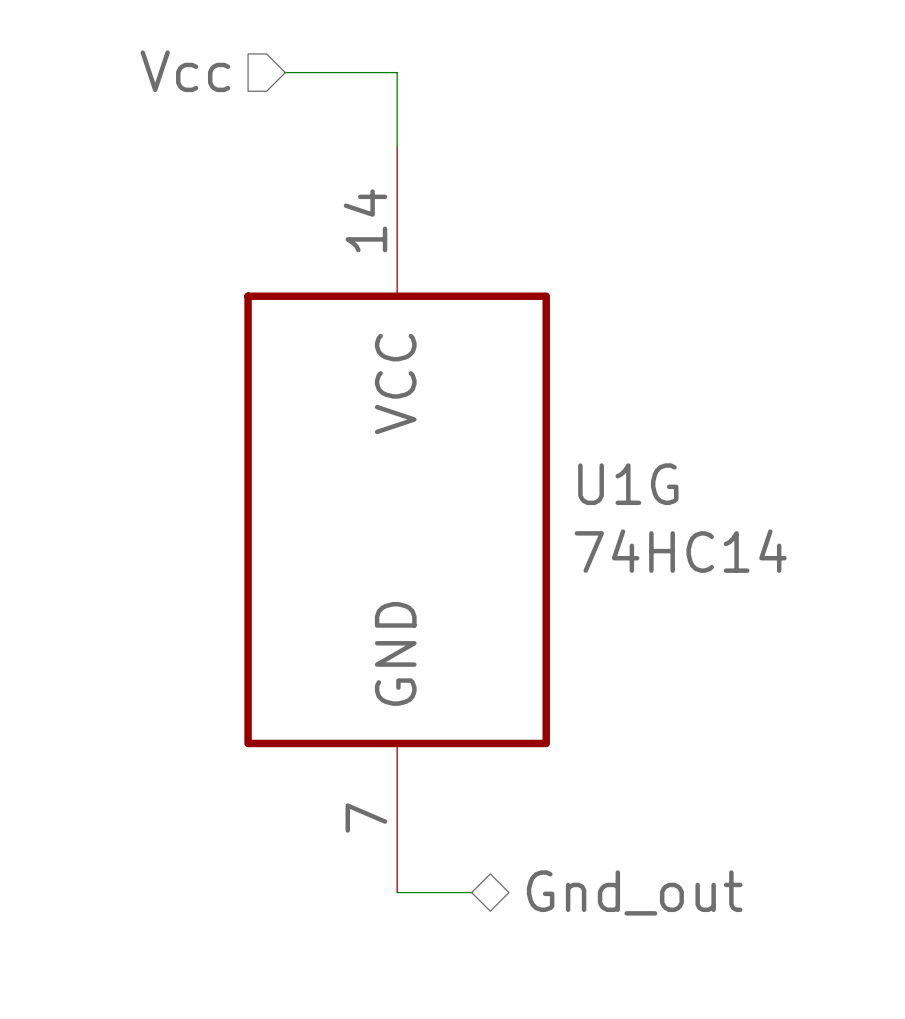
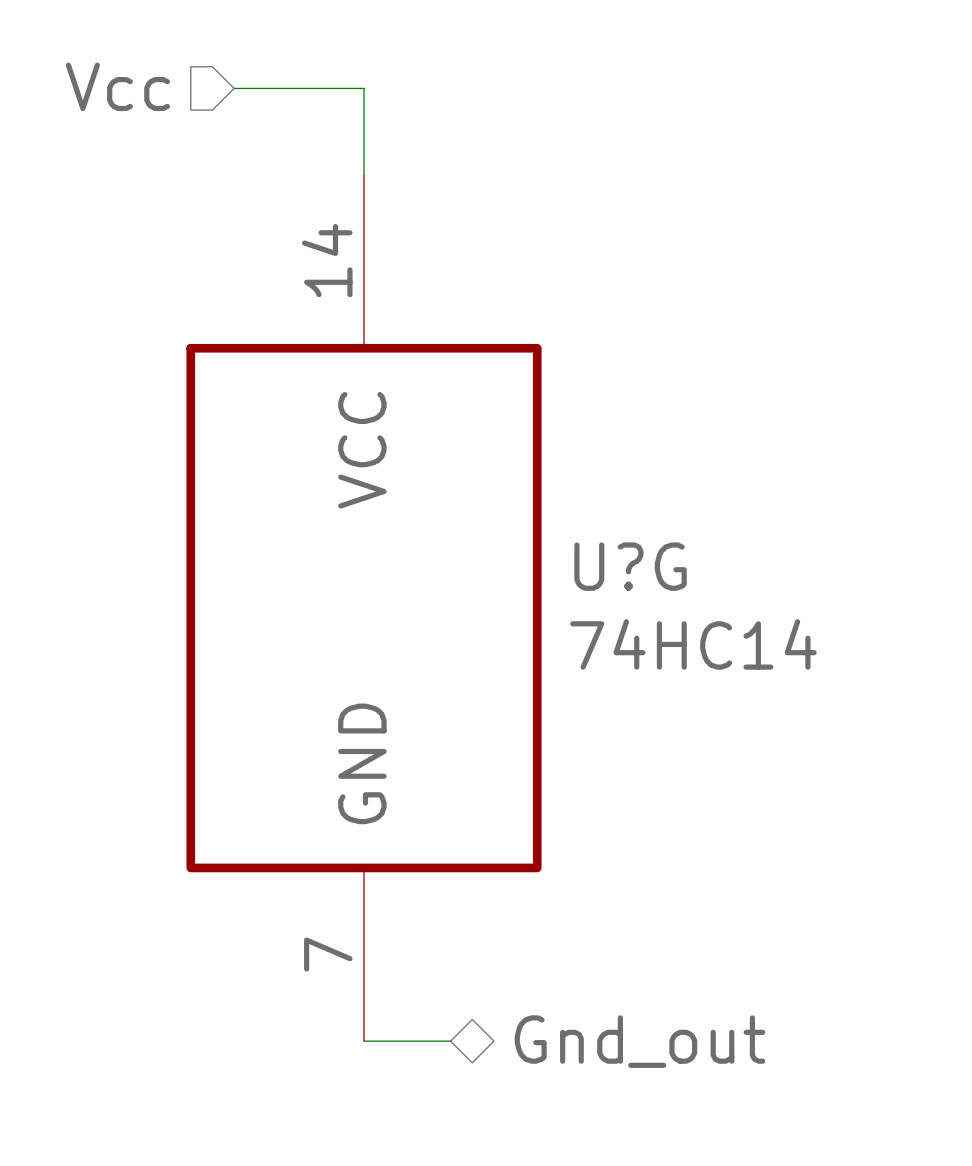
U1G name: U1G (628, 484) -> U?G (630, 566)

